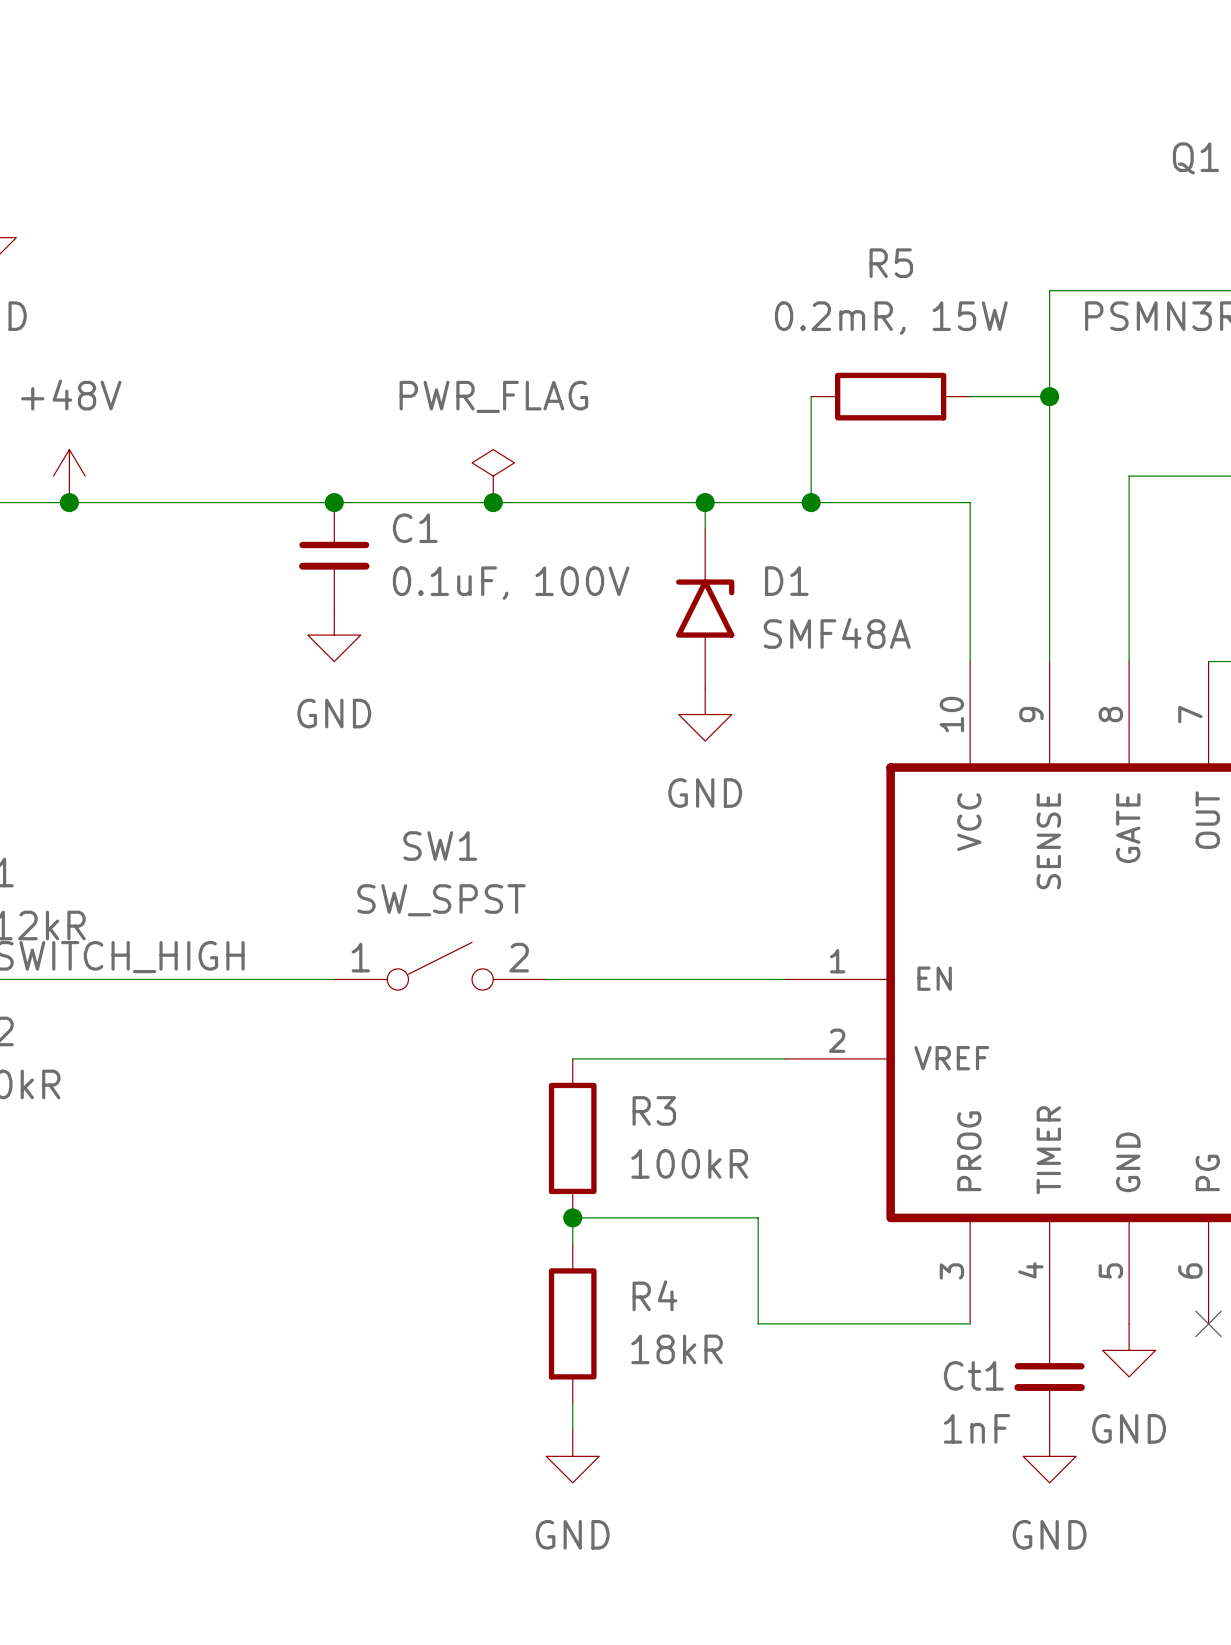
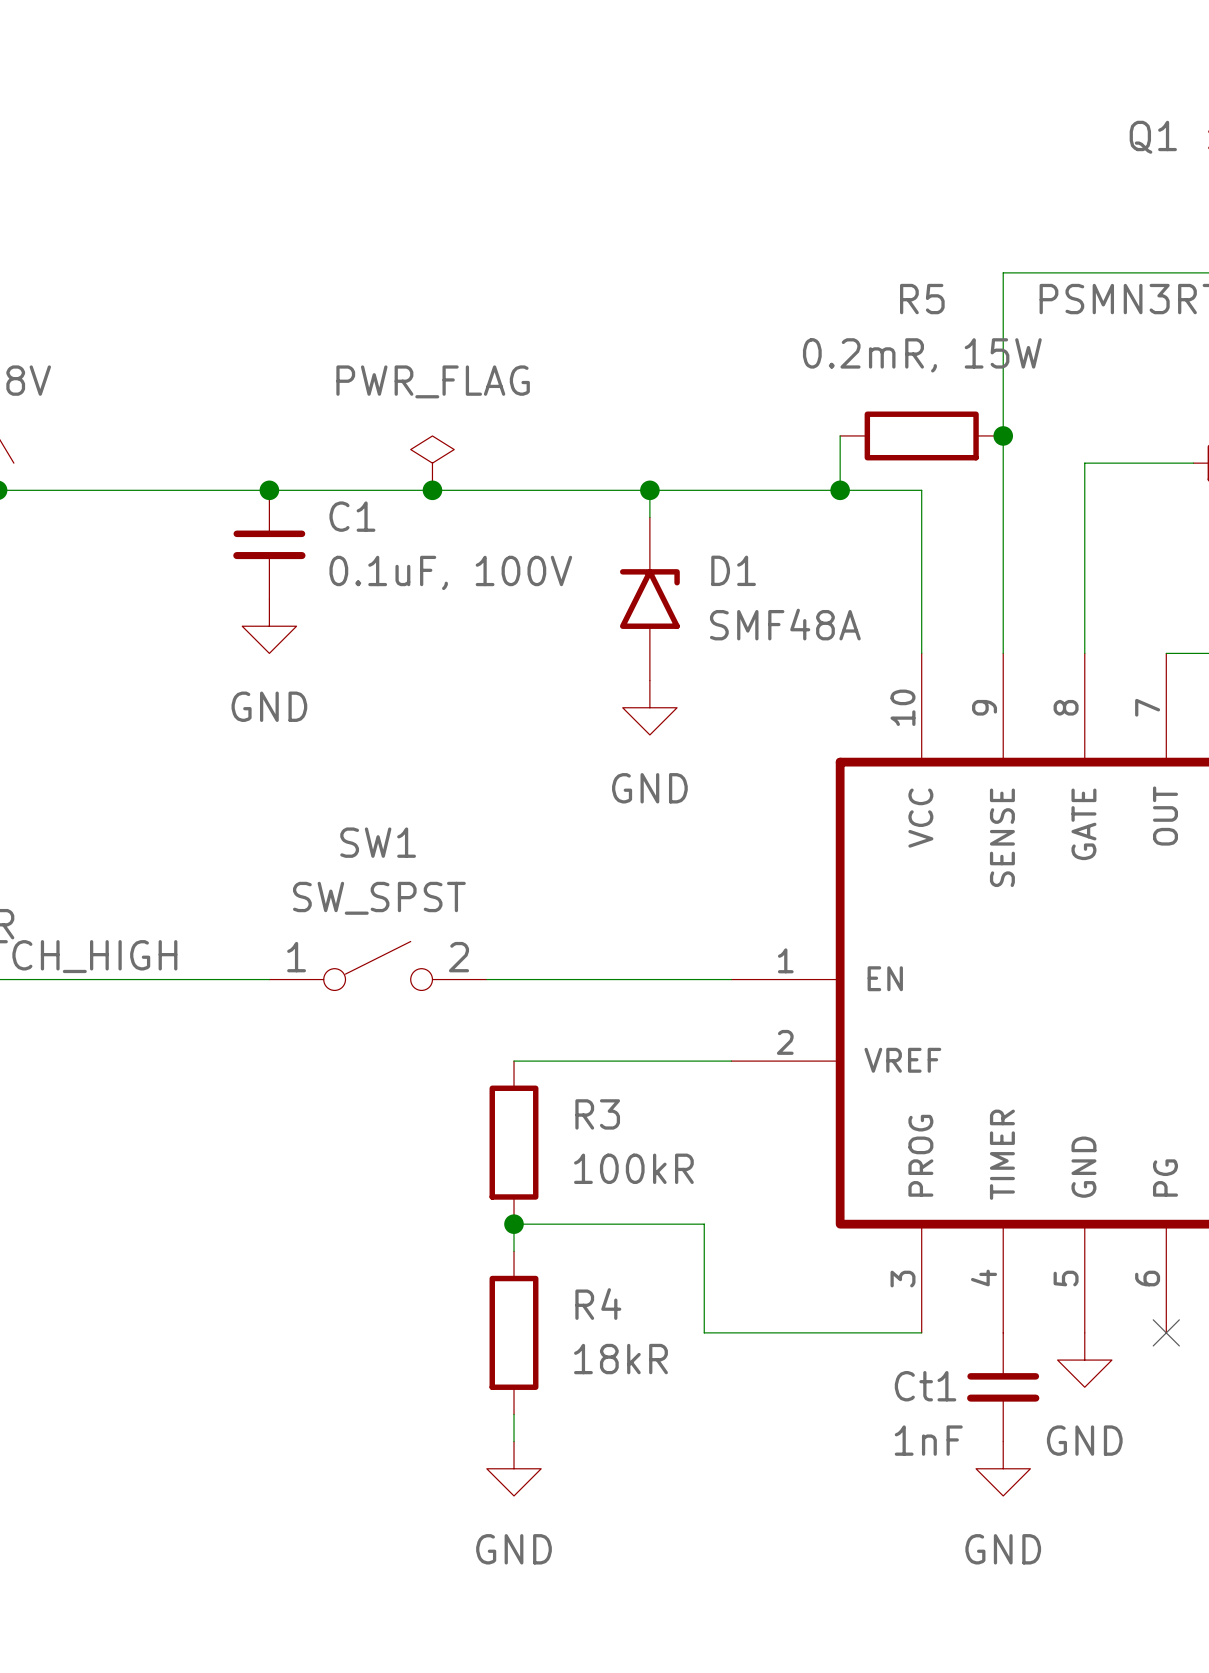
wire: (811, 396) (811, 502) -> none
R5 position: (890, 396) -> (921, 435)
wire: (970, 396) (1049, 396) -> none
junction position: (1049, 396) -> (1003, 435)
wire: none -> (840, 435) (840, 490)
junction position: (811, 502) -> (840, 490)

